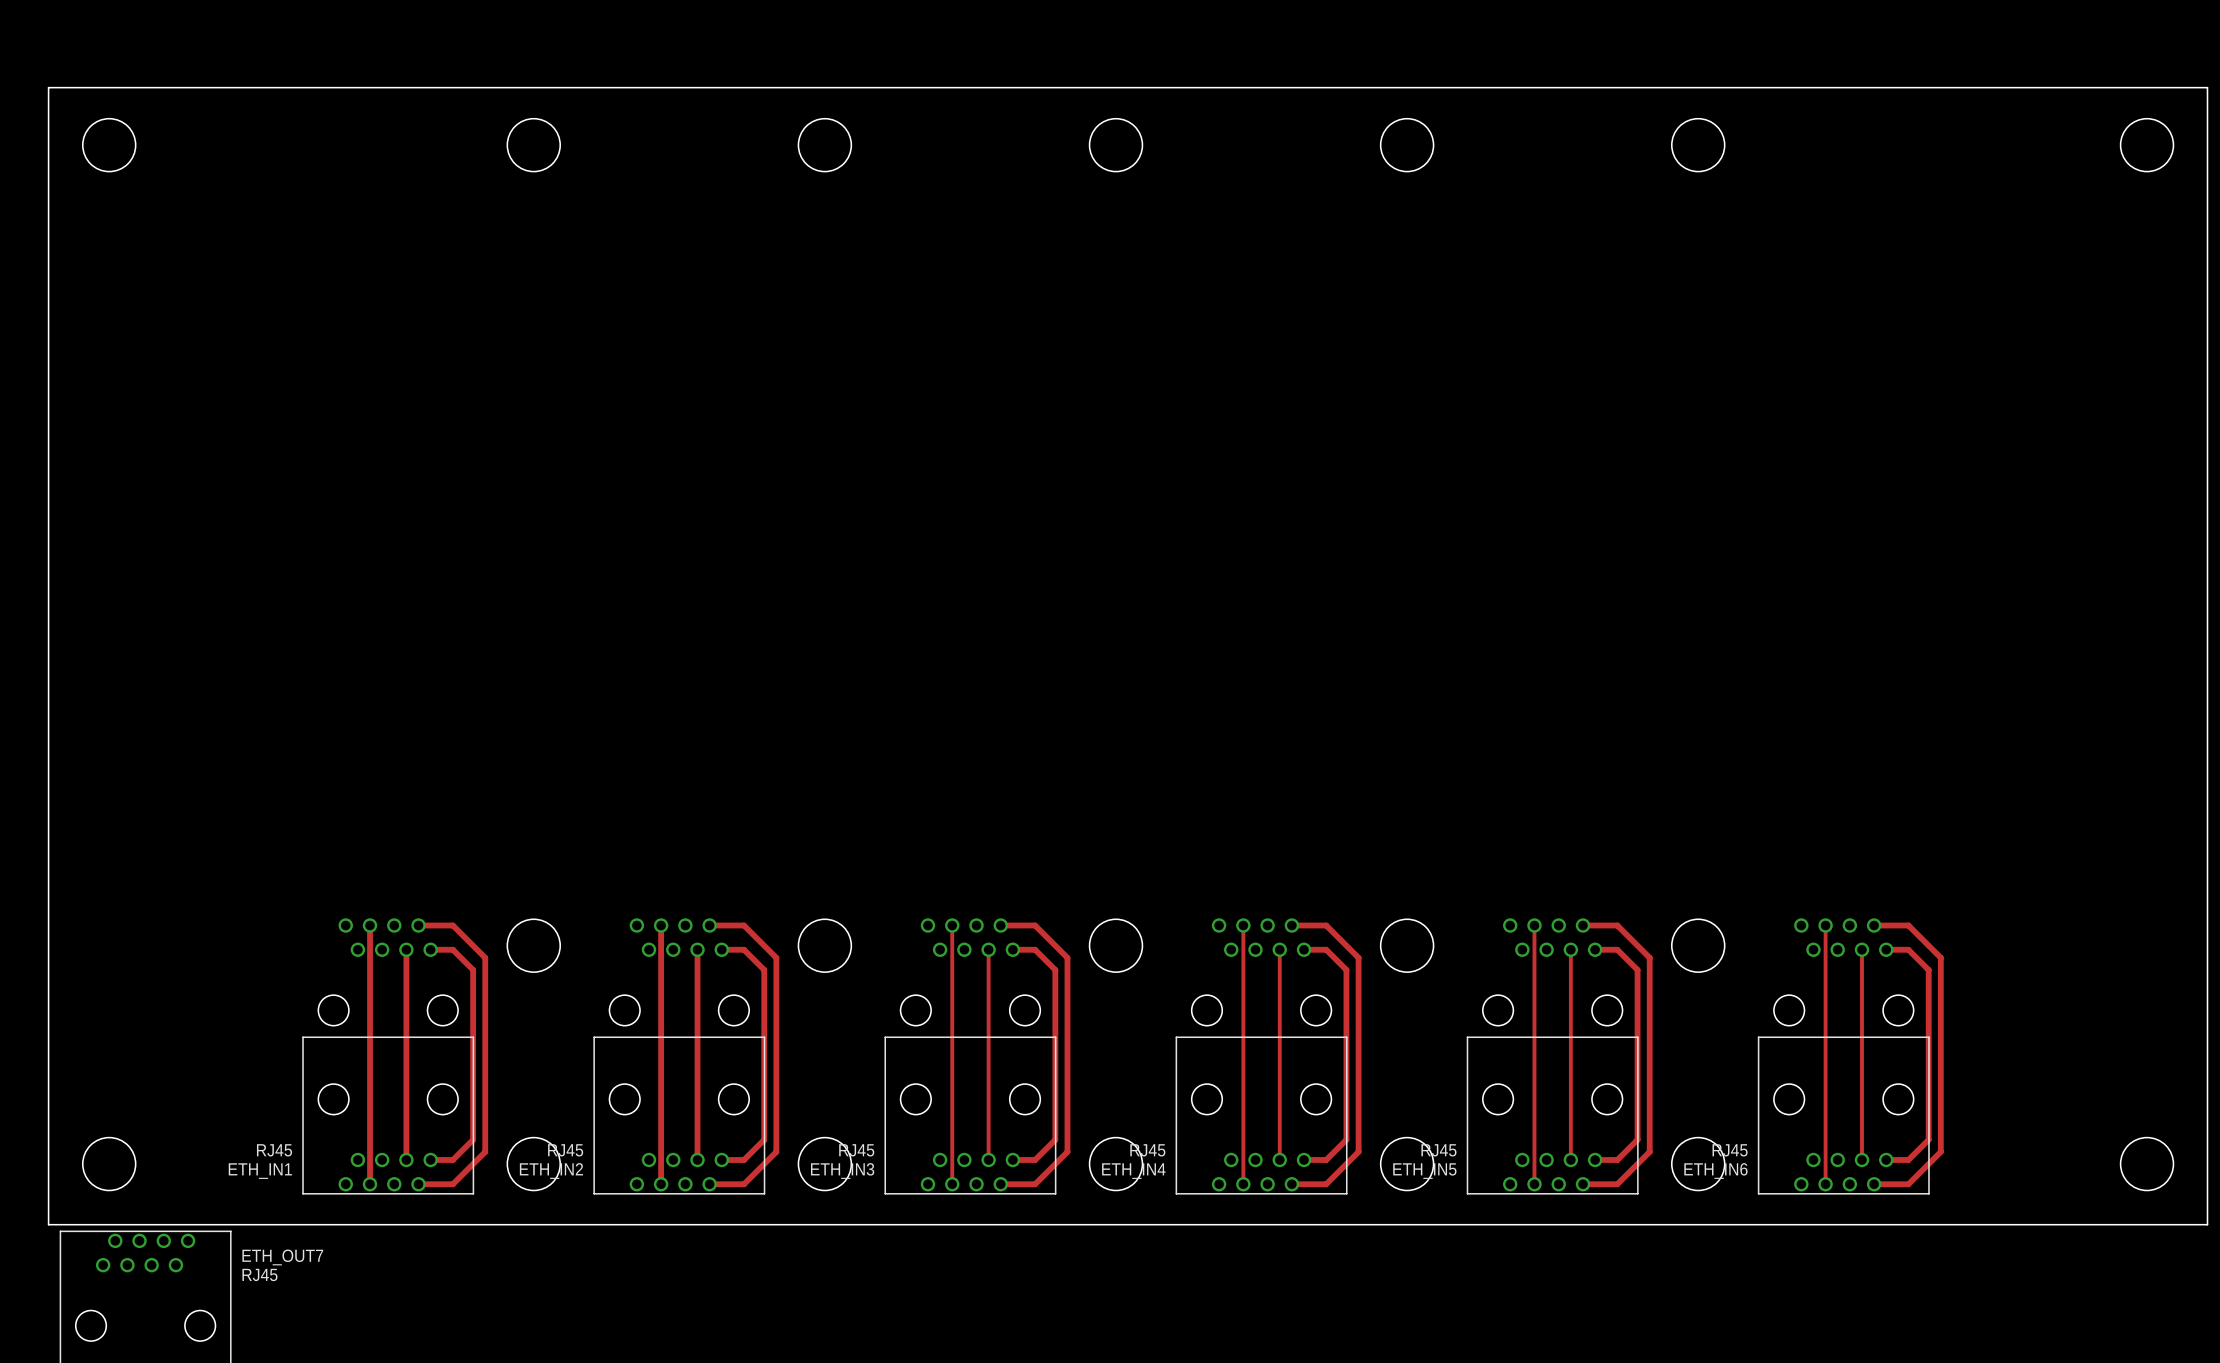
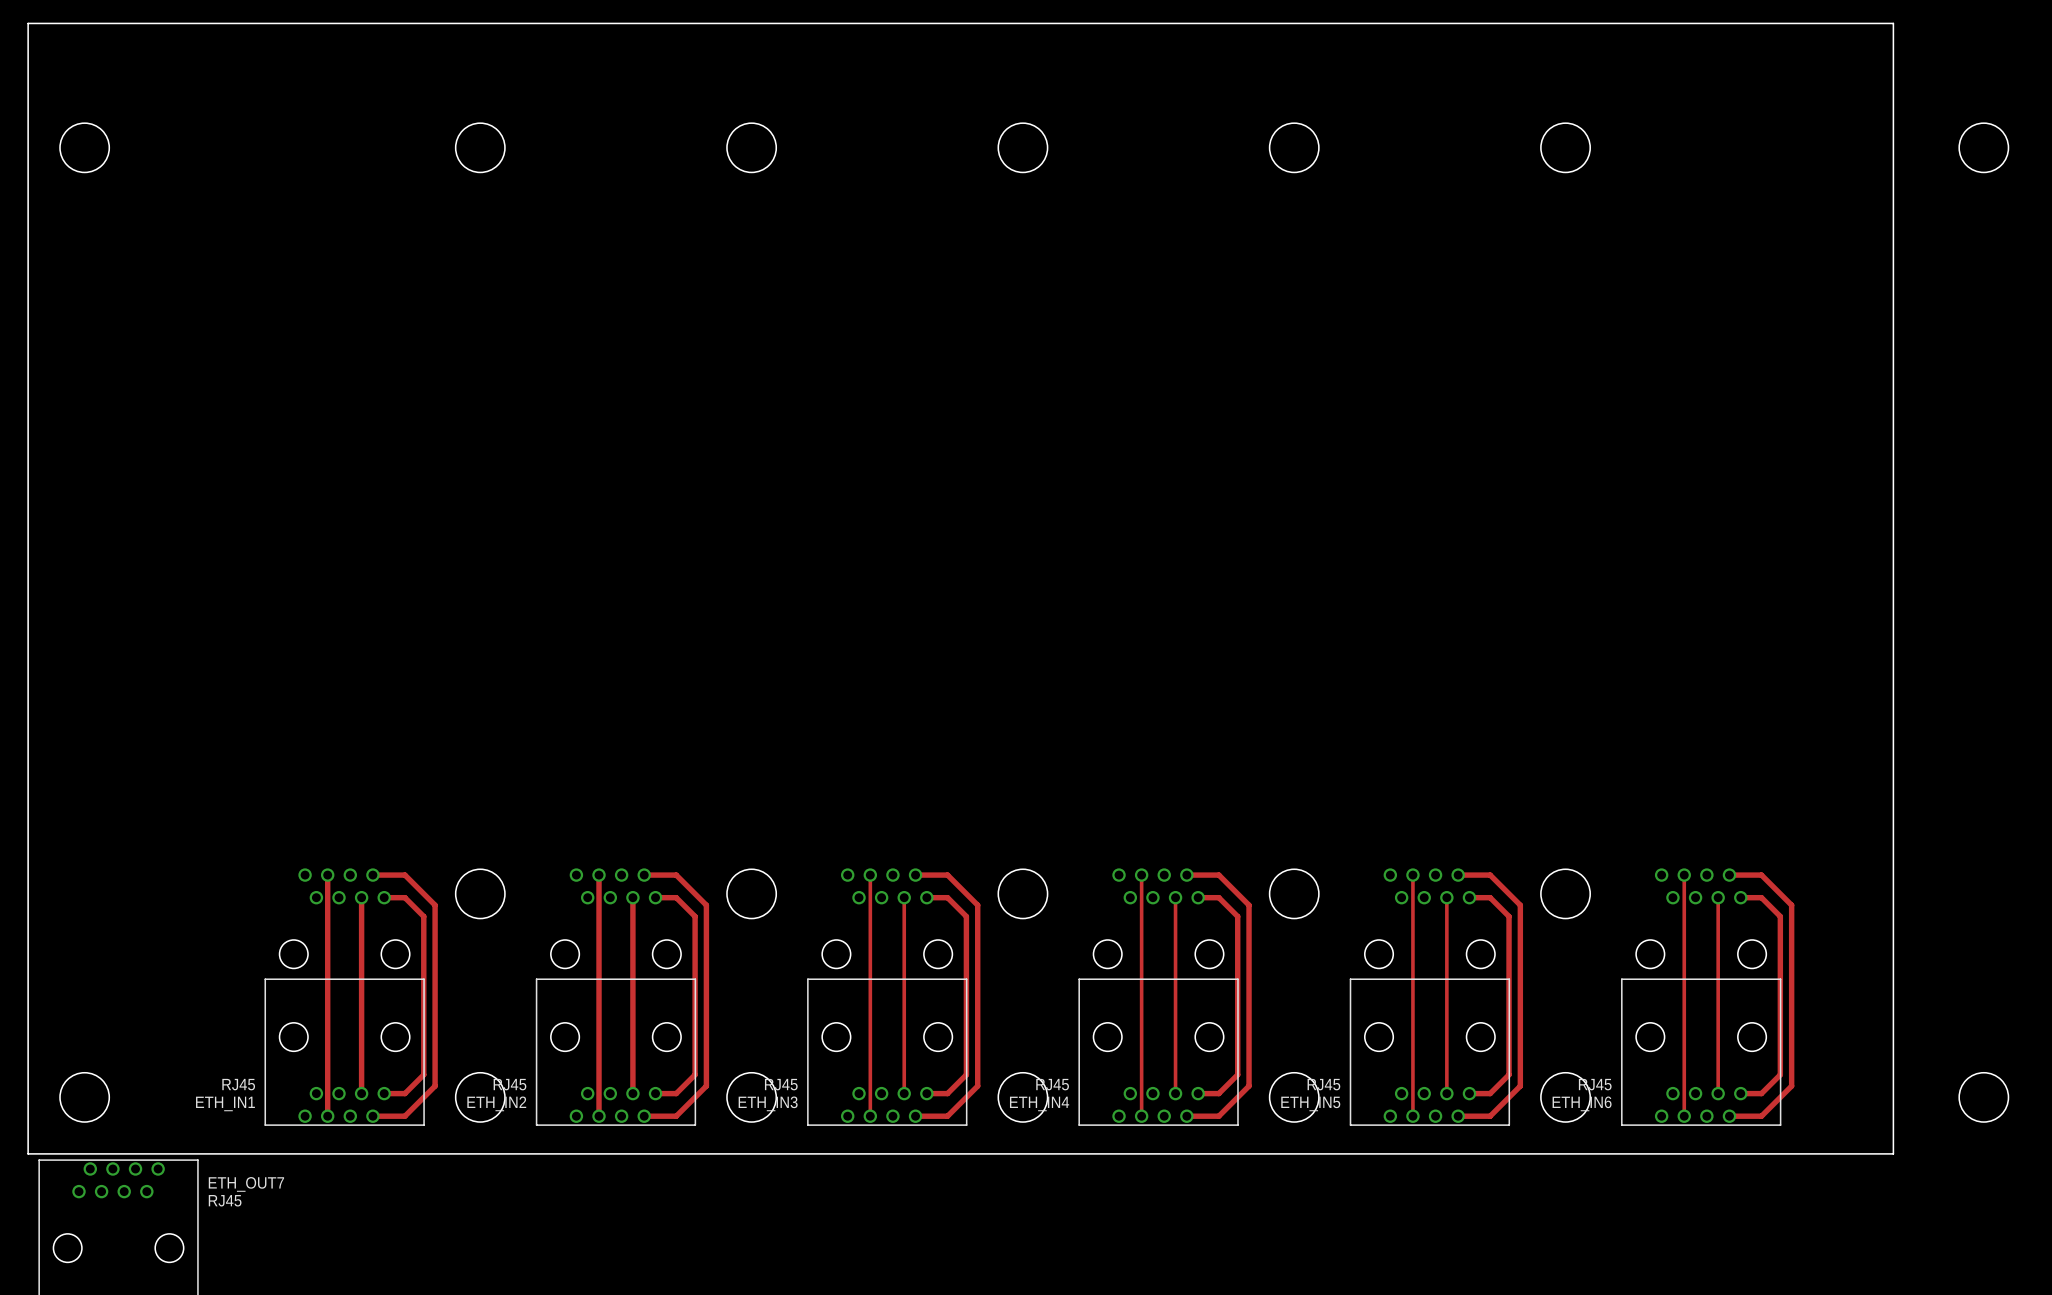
board edge: (48, 87) (2207, 87) (2207, 1224) (2049, 1224) -> (28, 94) (28, 23) (1893, 23) (1893, 1153)

